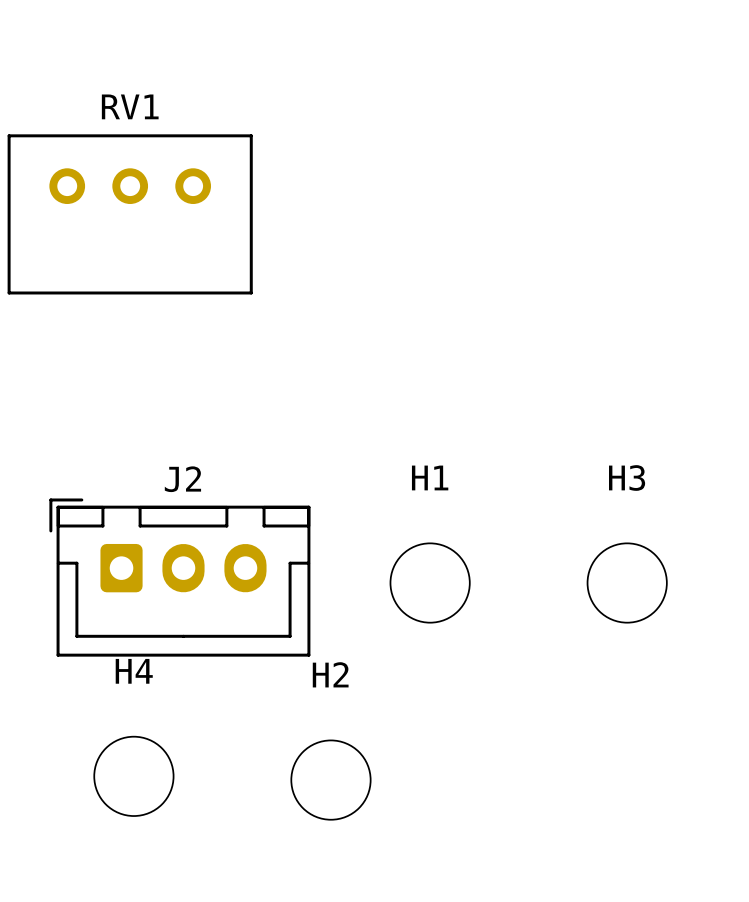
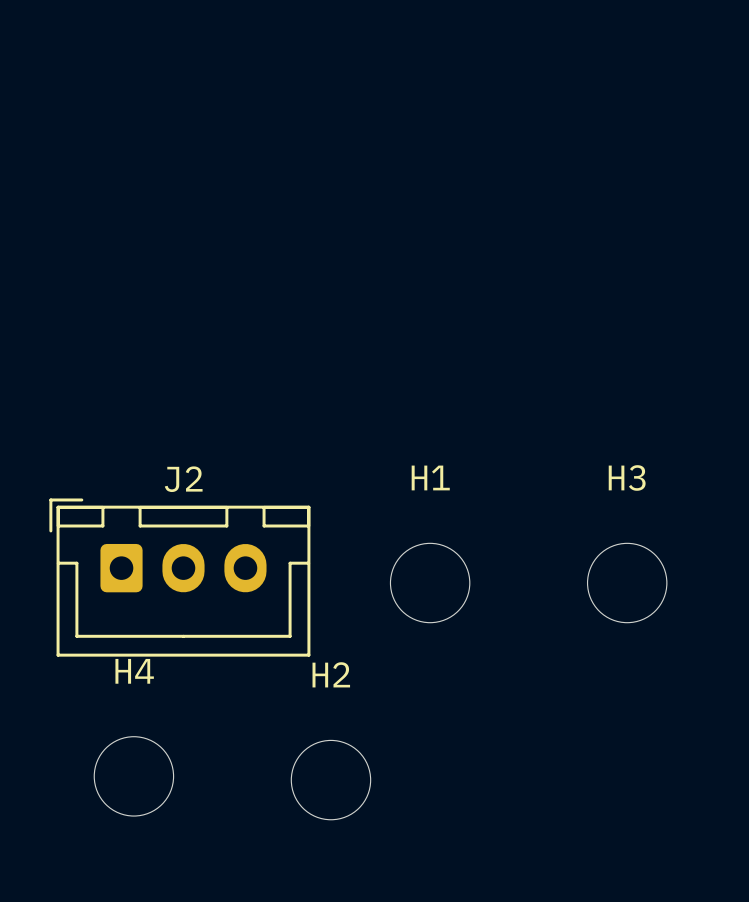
RV1: (130, 214) -> none

